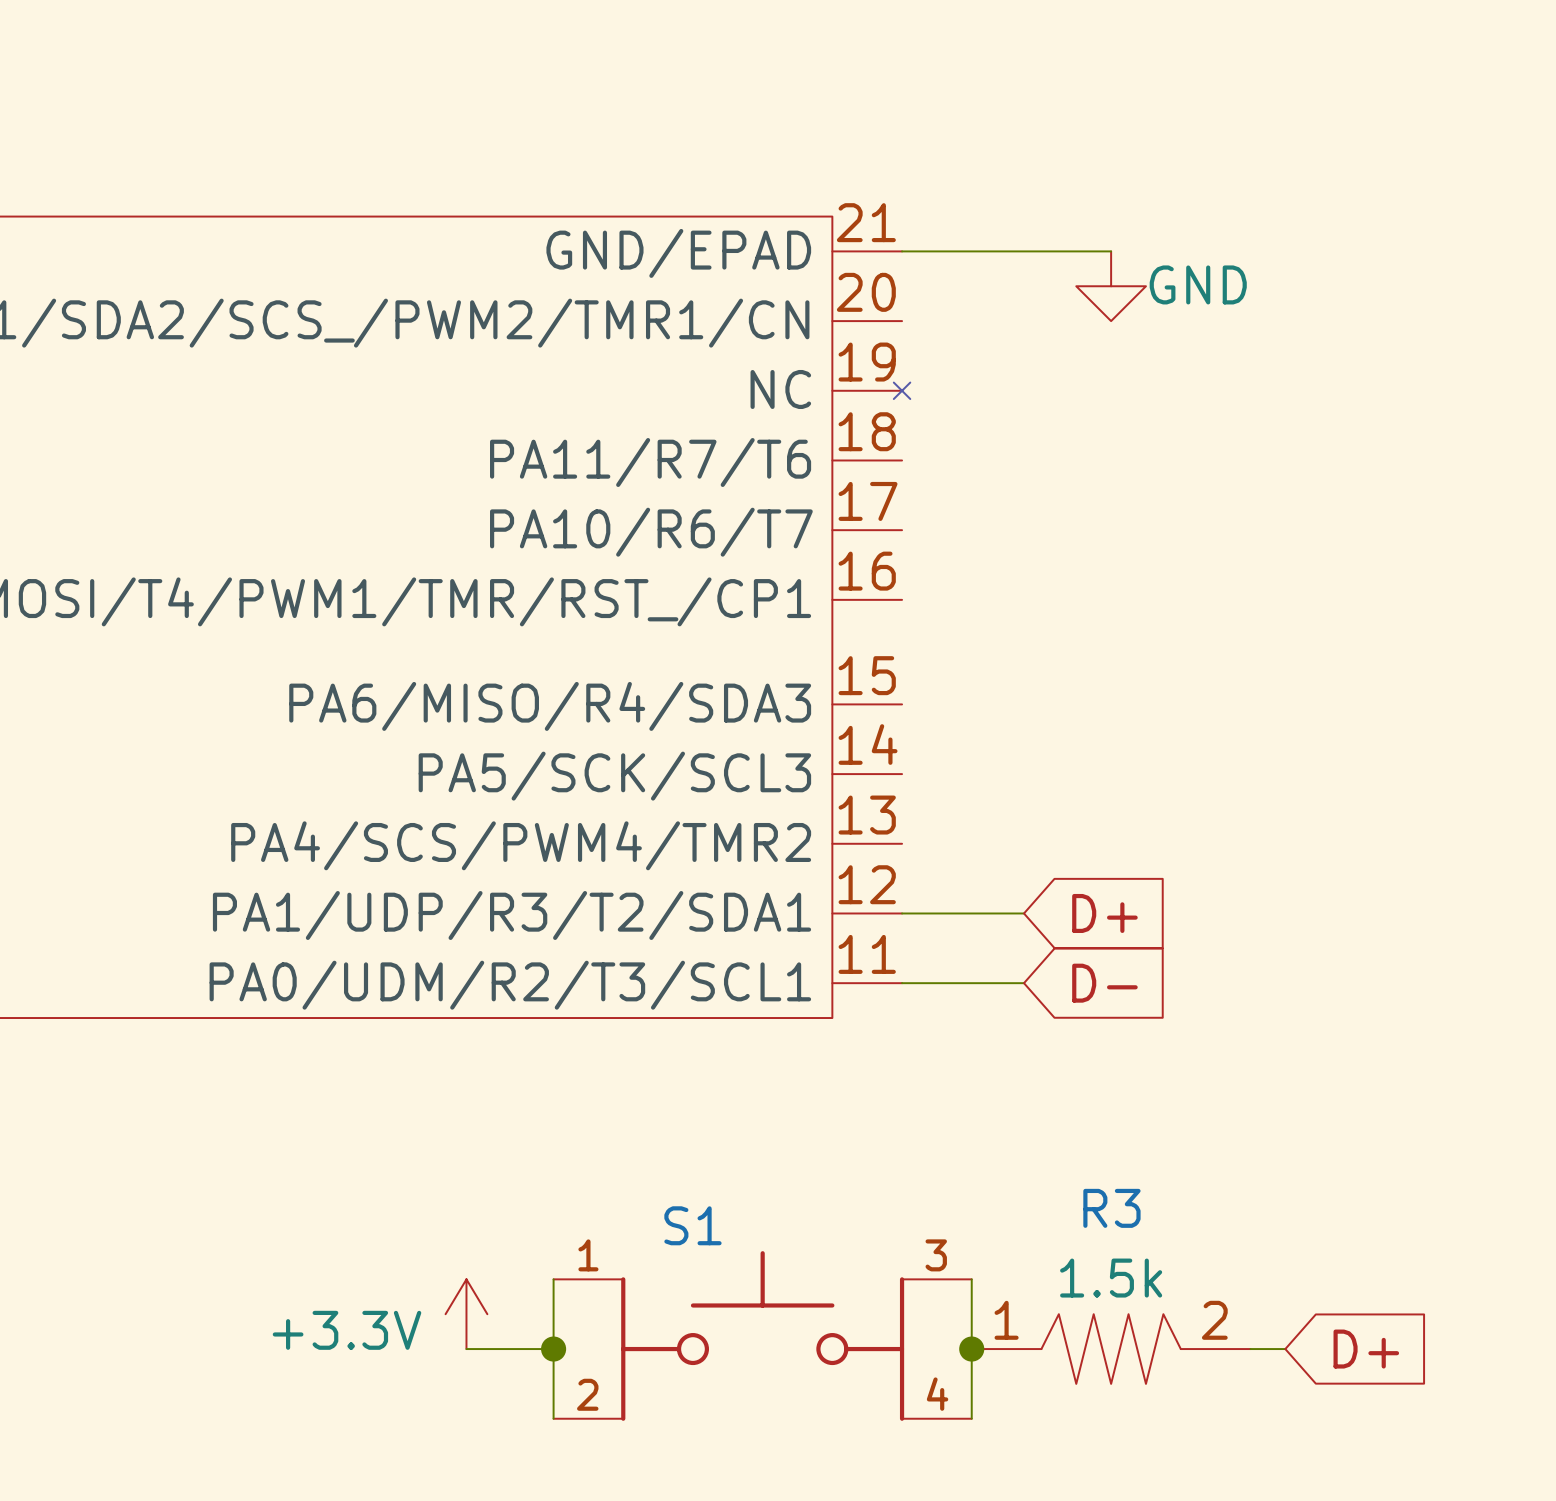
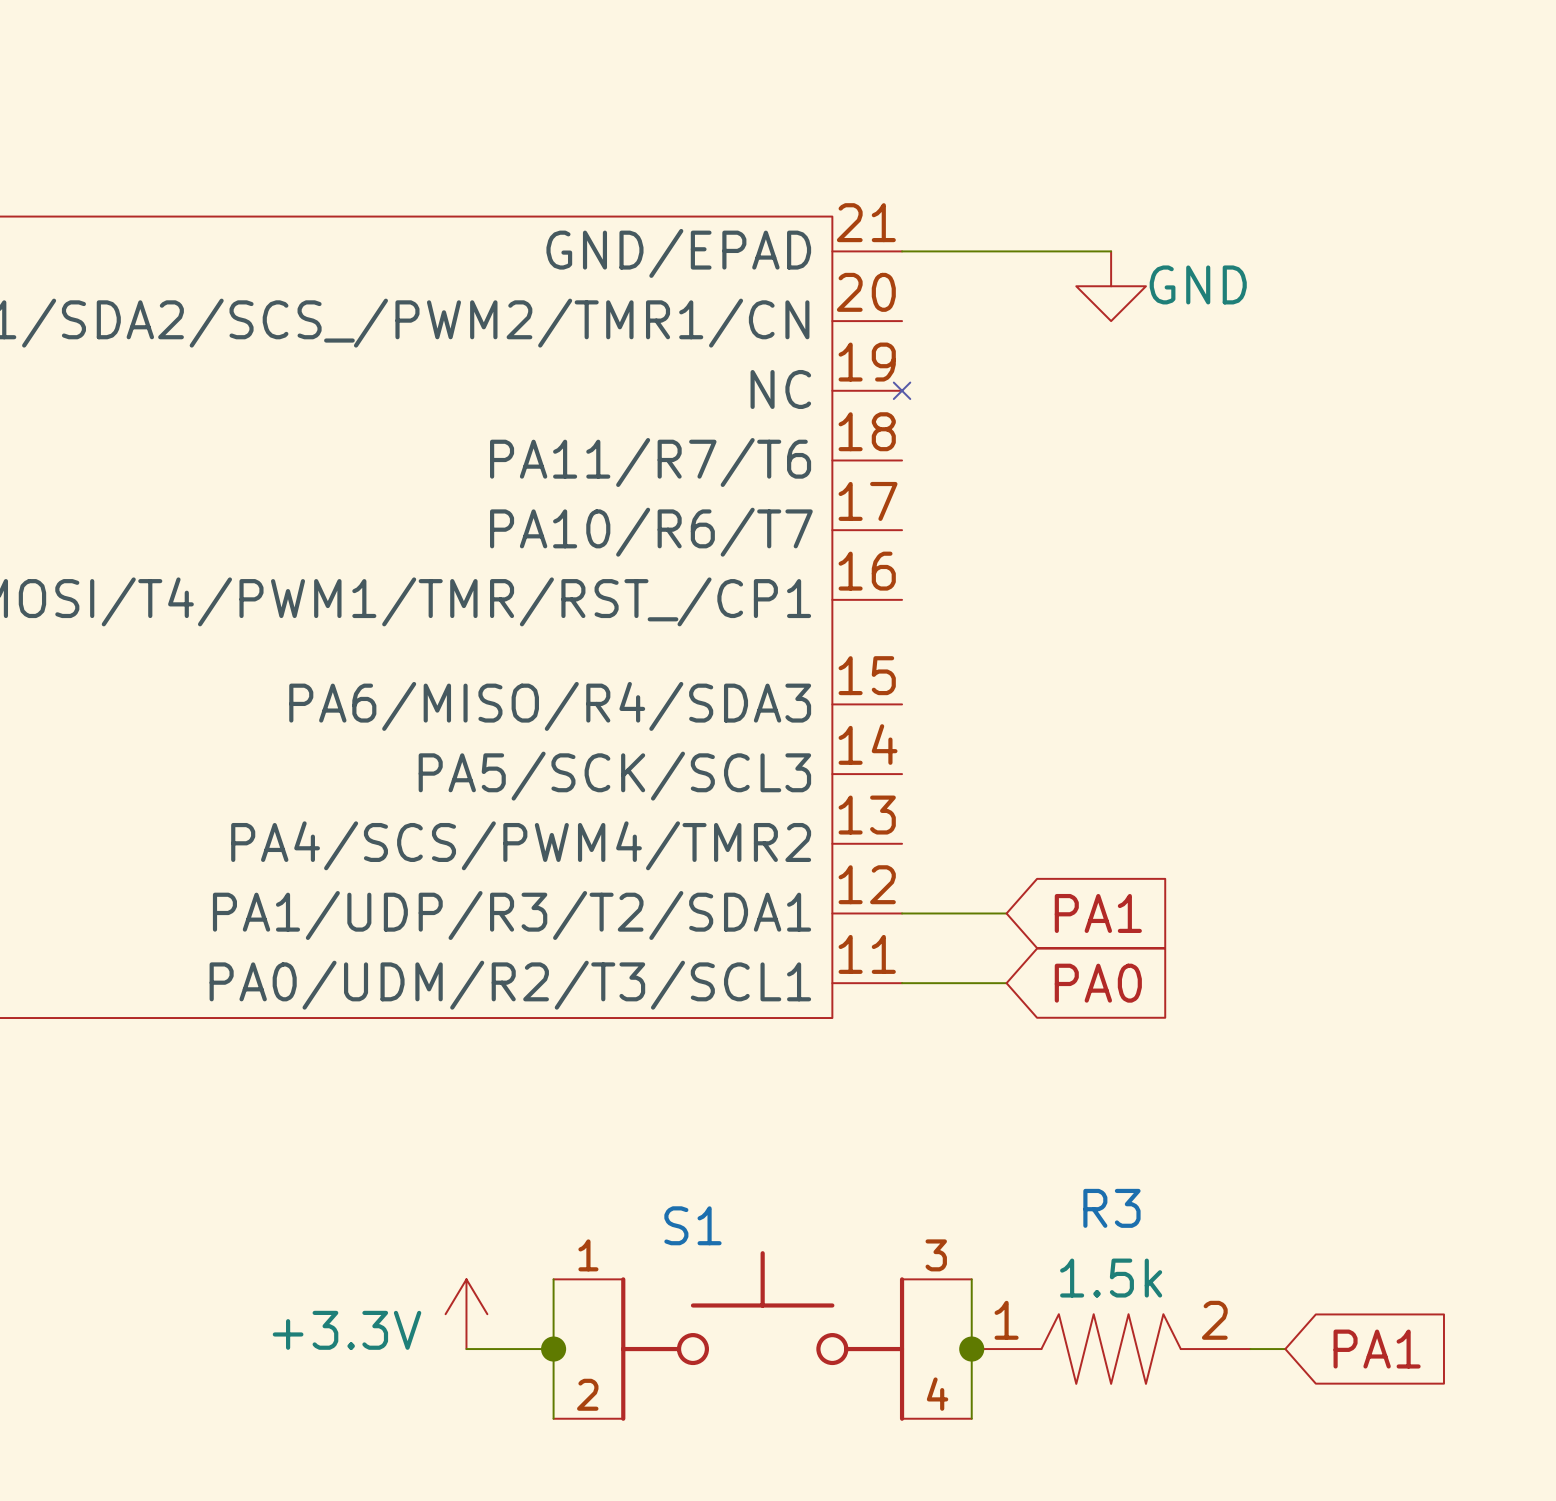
wire: (1006, 913) (1024, 913) -> none
global label: D+ (1104, 913) -> PA1 (1098, 913)
wire: (1006, 983) (1024, 983) -> none
global label: D- (1104, 983) -> PA0 (1098, 983)
global label: D+ (1366, 1349) -> PA1 (1377, 1349)

